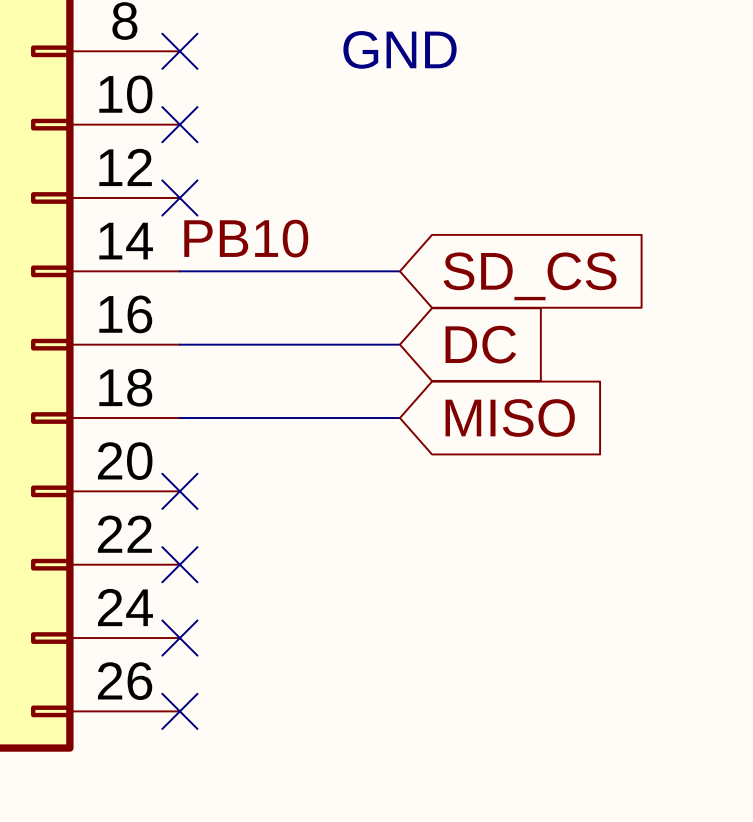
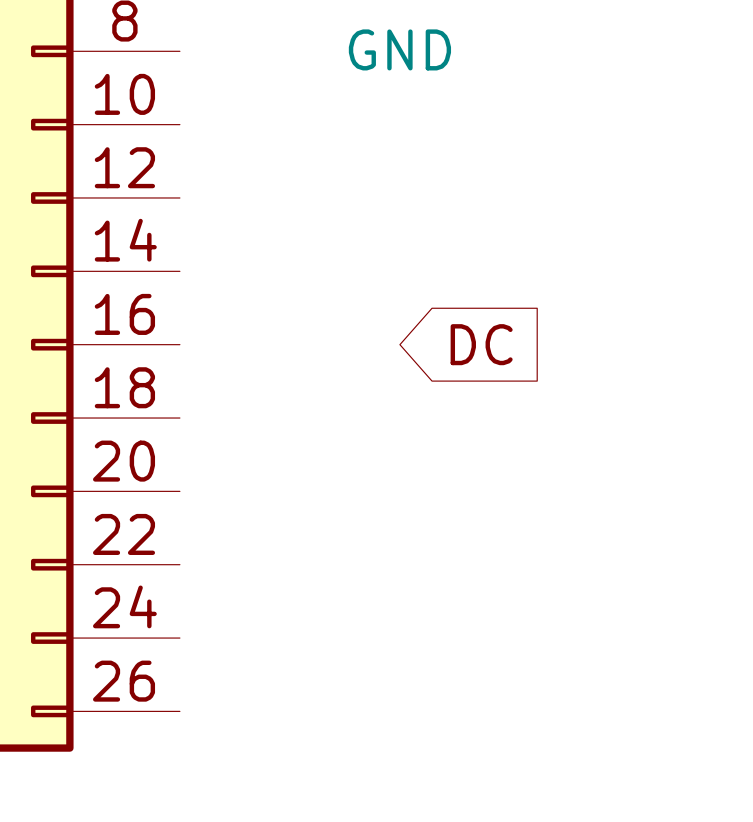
no-connect mark: (179, 51) -> none
no-connect mark: (179, 124) -> none
no-connect mark: (179, 197) -> none
label: PB10 (246, 238) -> none
wire: (179, 271) (399, 271) -> none
global label: SD_CS (530, 276) -> none
wire: (179, 344) (399, 344) -> none
wire: (179, 418) (399, 418) -> none
global label: MISO (510, 418) -> none
no-connect mark: (179, 491) -> none
no-connect mark: (179, 564) -> none
no-connect mark: (179, 638) -> none
no-connect mark: (179, 711) -> none

